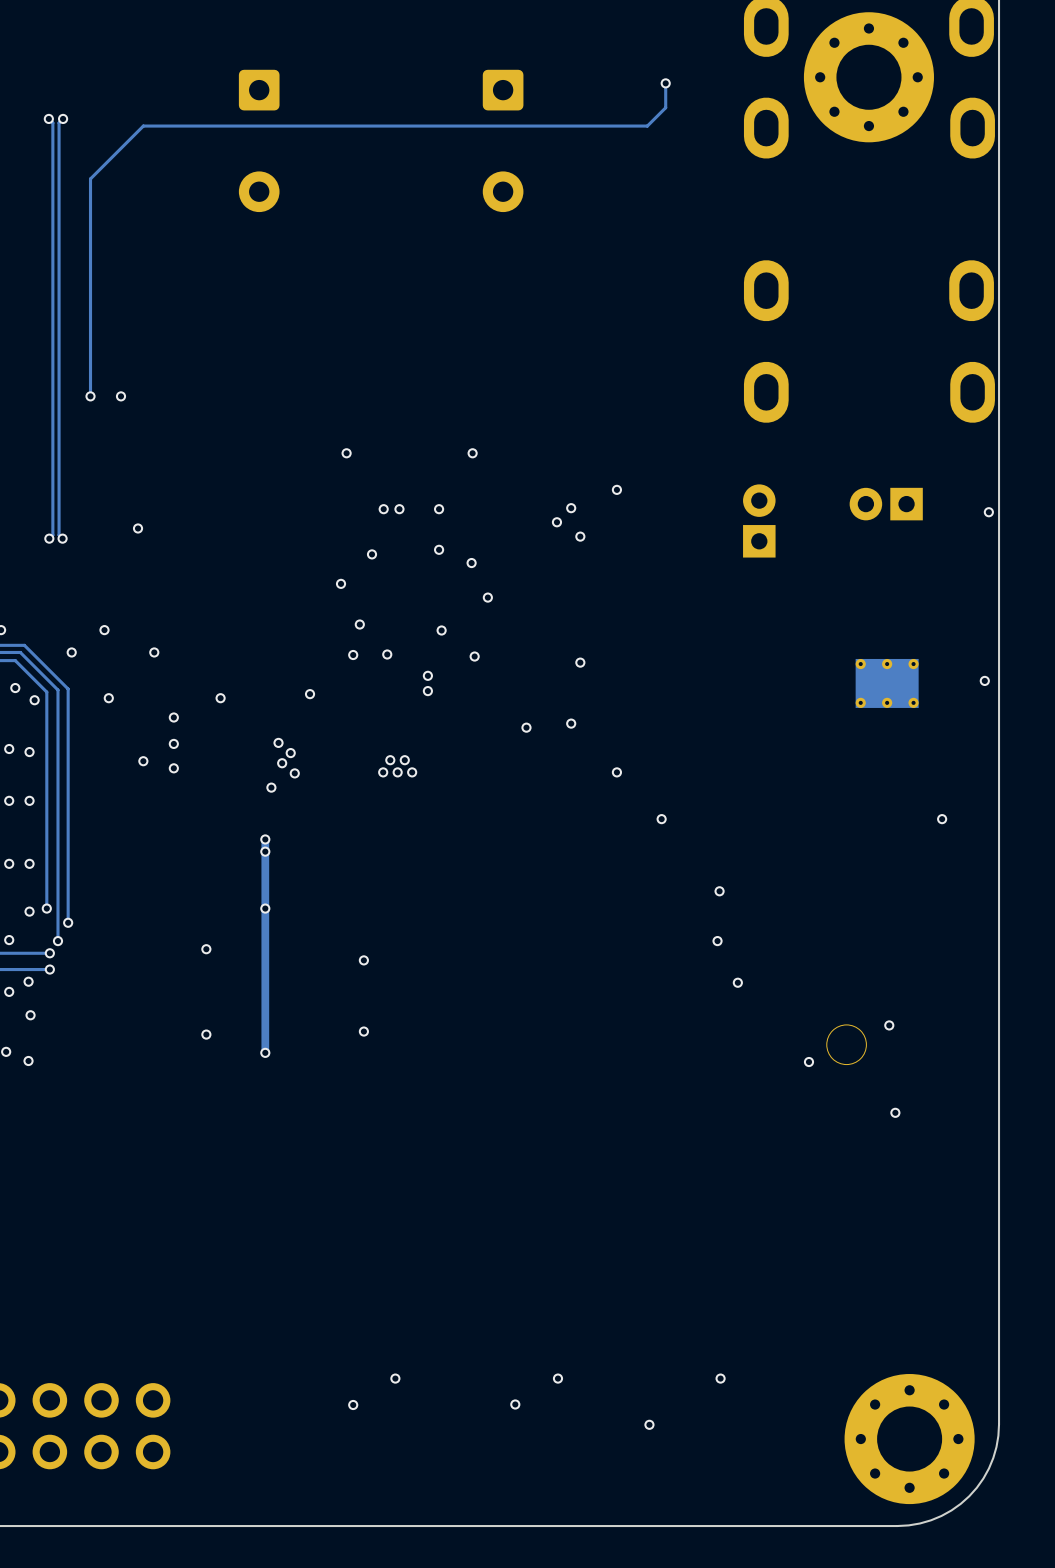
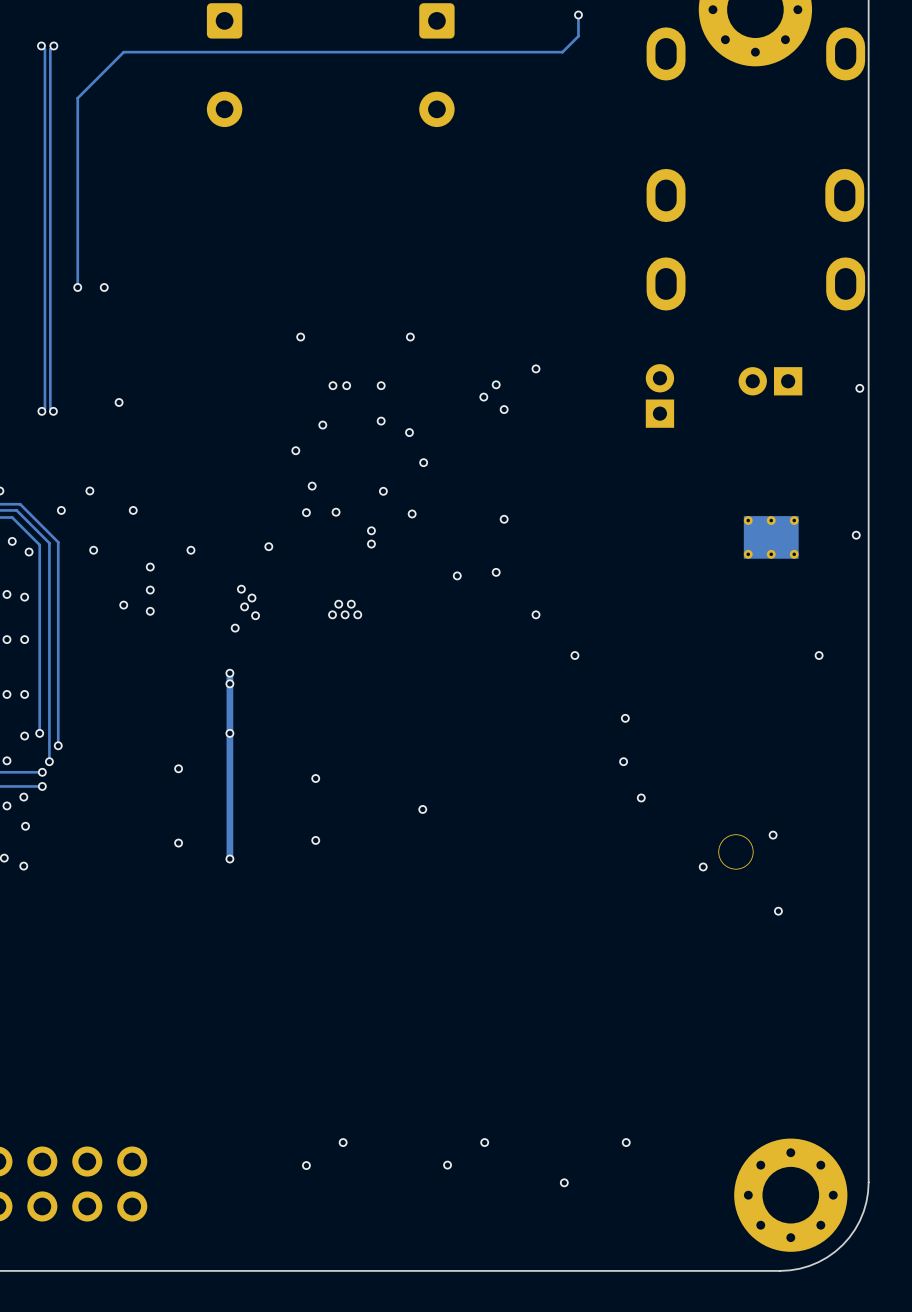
via: none -> (422, 809)

